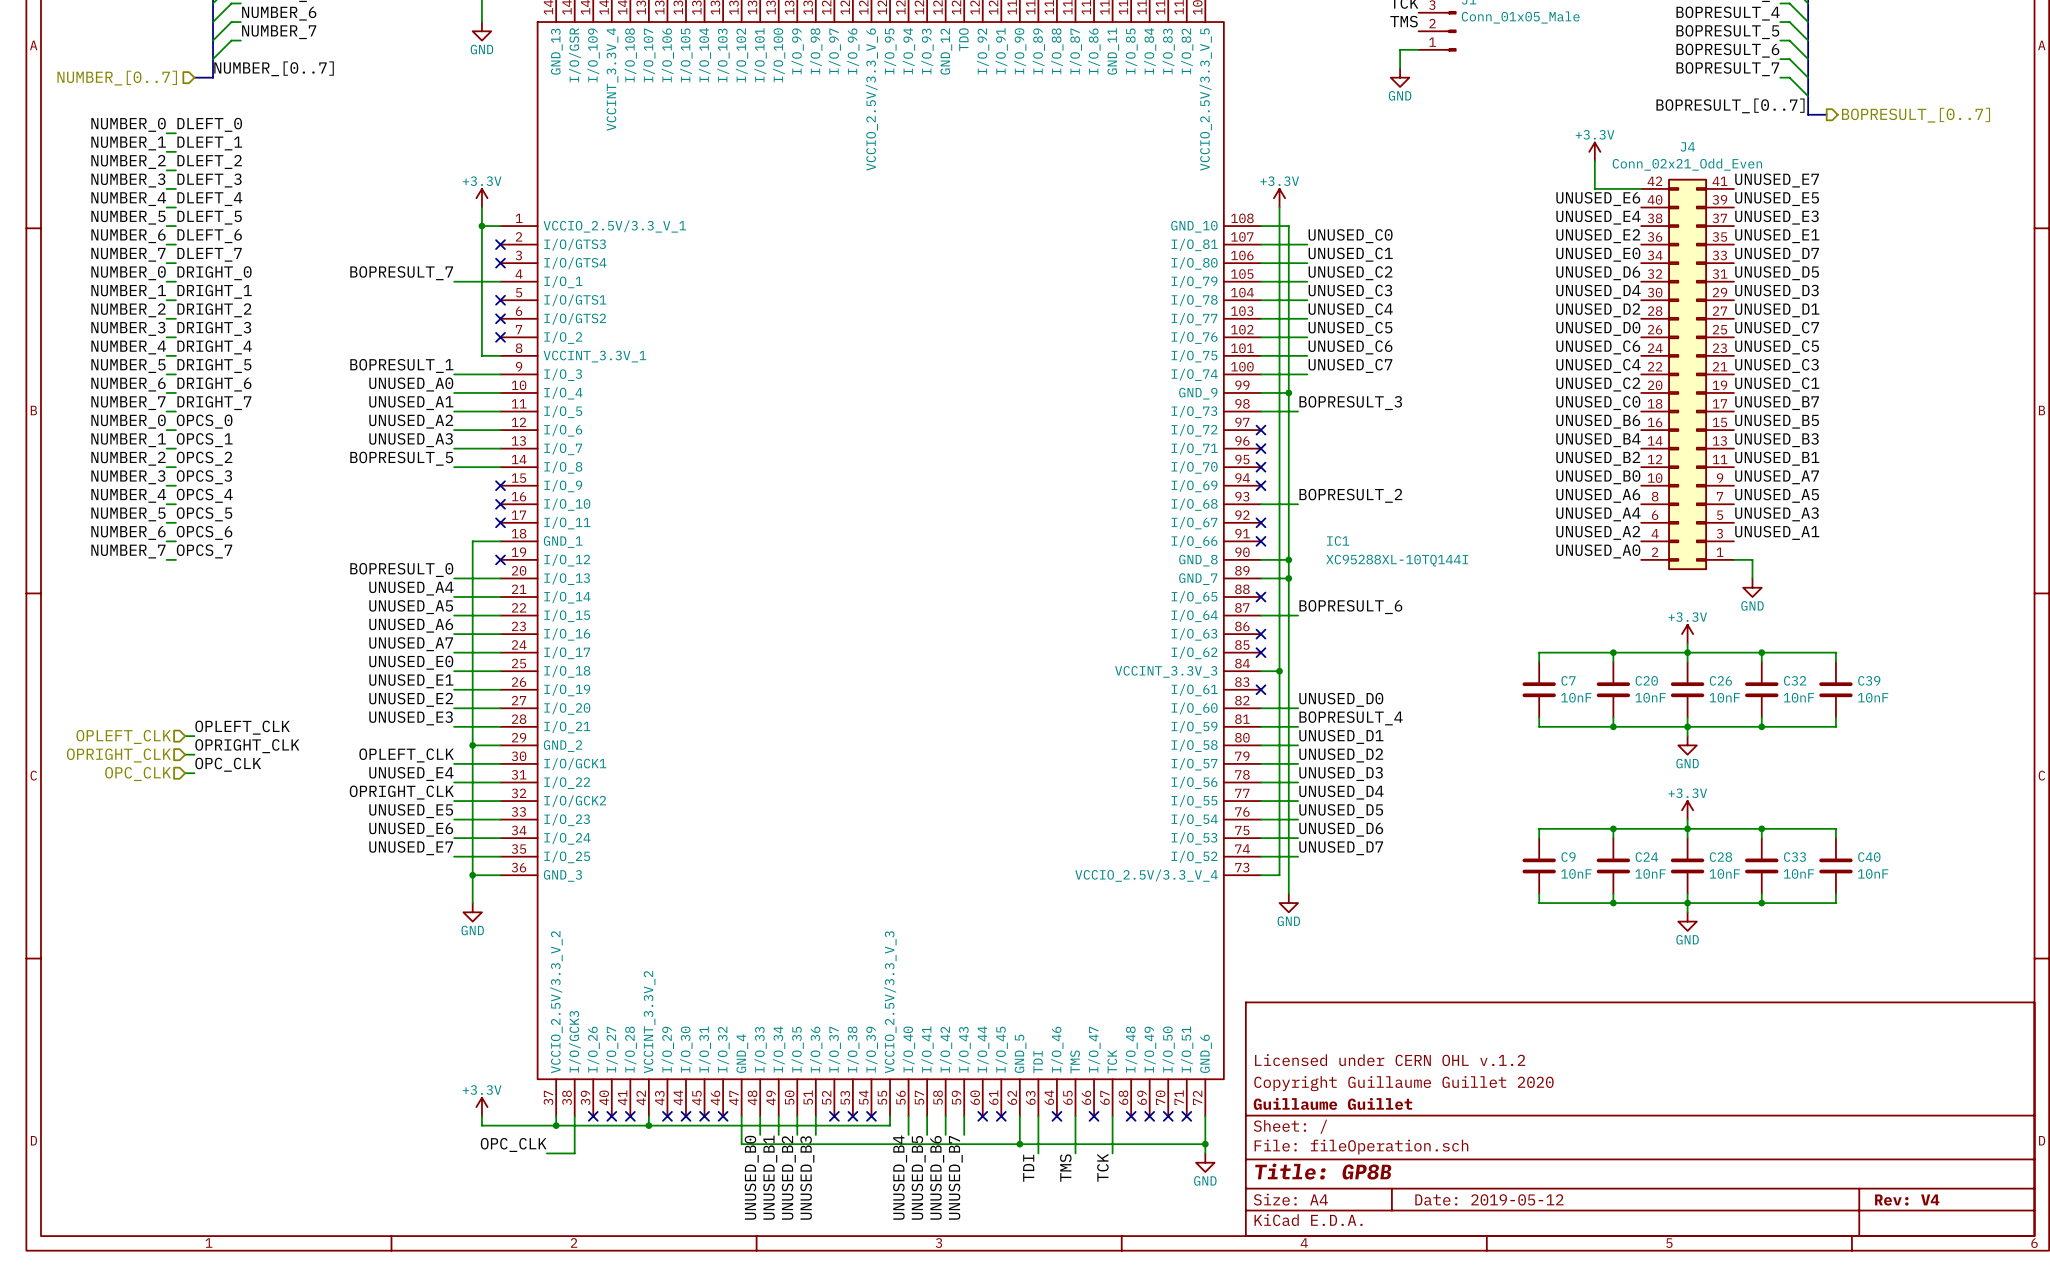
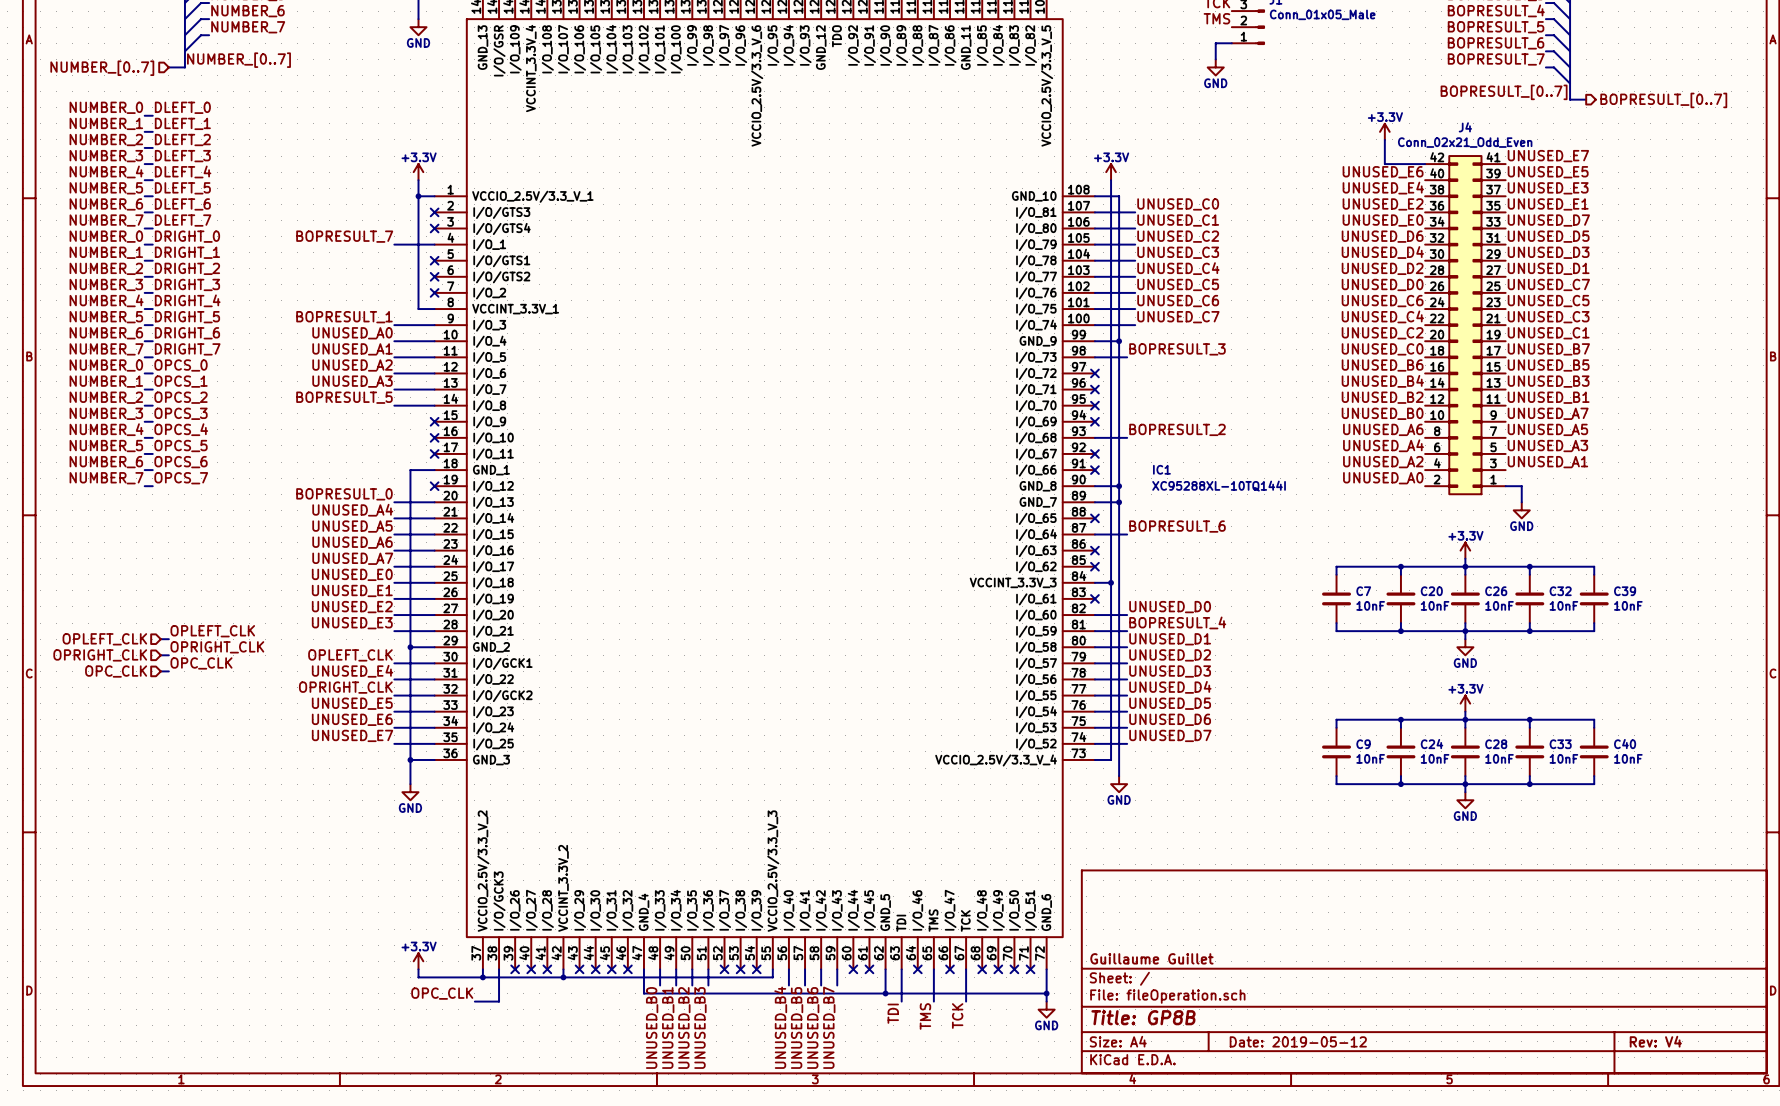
title block: Licensed under CERN OHL v.1.2 (1390, 1060) -> none
title block: Copyright Guillaume Guillet 2020 (1403, 1083) -> none

